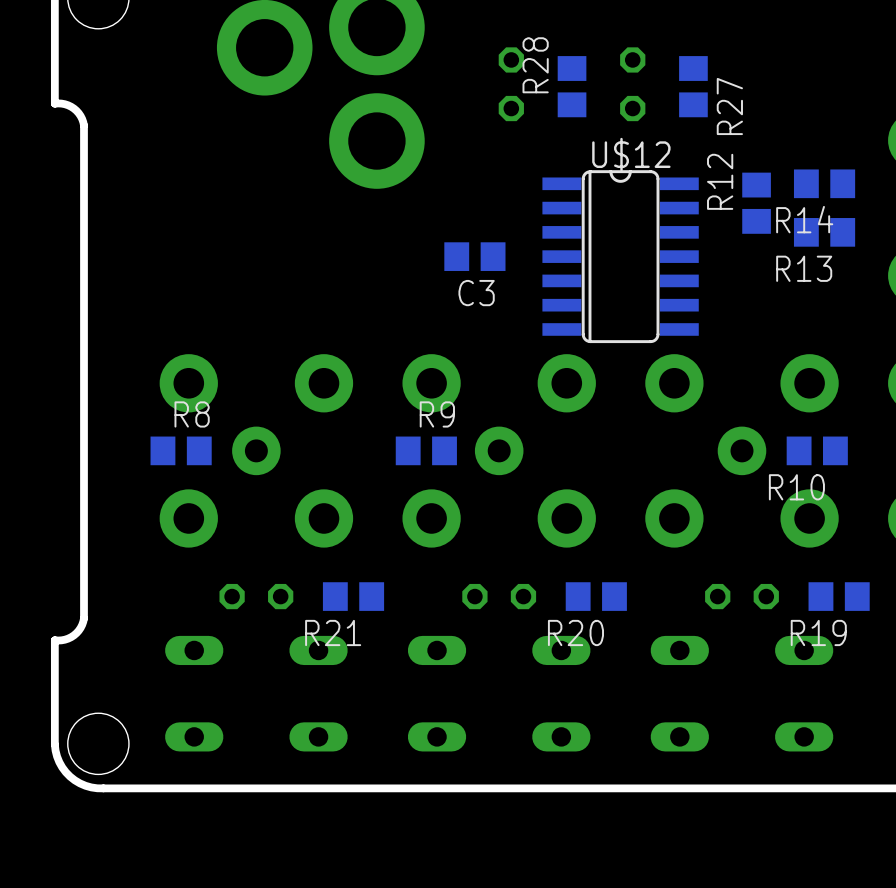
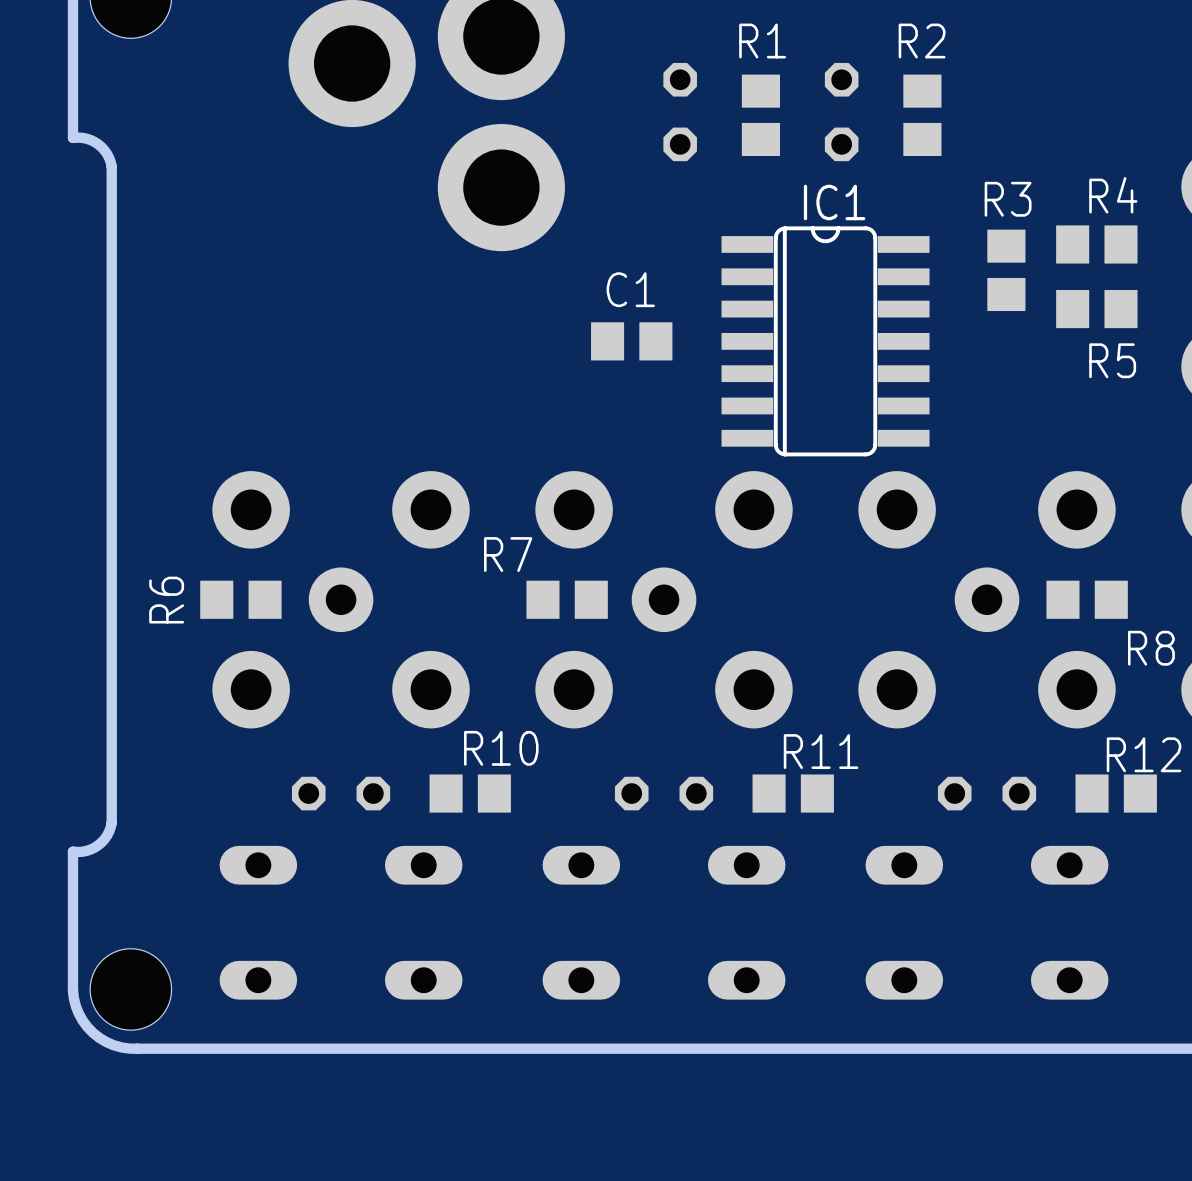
R28 name: R28 (535, 65) -> R1 (762, 41)
R27 name: R27 (729, 106) -> R2 (922, 41)
U$12 name: U$12 (631, 154) -> IC1 (834, 202)
R12 name: R12 (720, 181) -> R3 (1008, 199)
R14 name: R14 (804, 219) -> R4 (1113, 195)
R13 name: R13 (804, 268) -> R5 (1112, 360)
C3 name: C3 (476, 293) -> C1 (630, 289)
R8 name: R8 (192, 414) -> R6 (166, 600)
R9 name: R9 (437, 414) -> R7 (508, 554)
R10 name: R10 (796, 487) -> R8 (1151, 648)
R21 name: R21 (333, 632) -> R10 (501, 748)
R20 name: R20 (575, 632) -> R11 (821, 751)
R19 name: R19 (818, 632) -> R12 (1144, 754)

